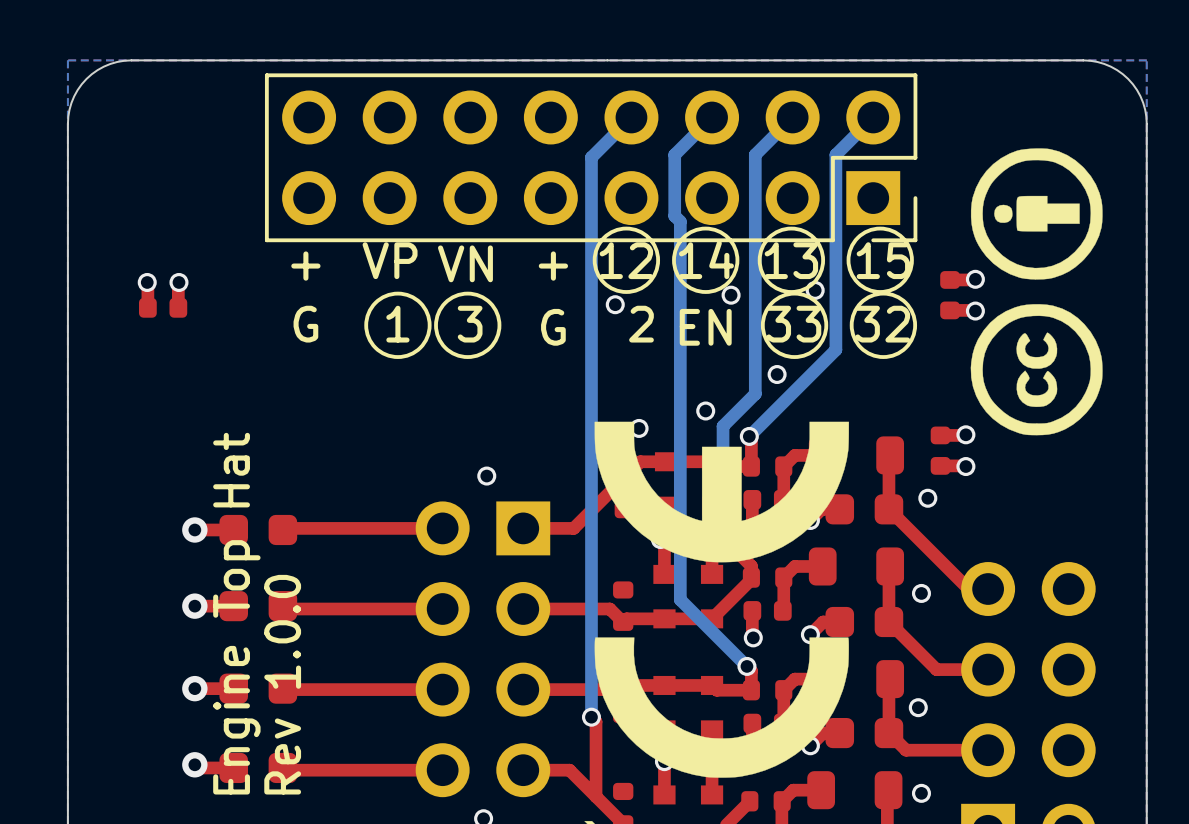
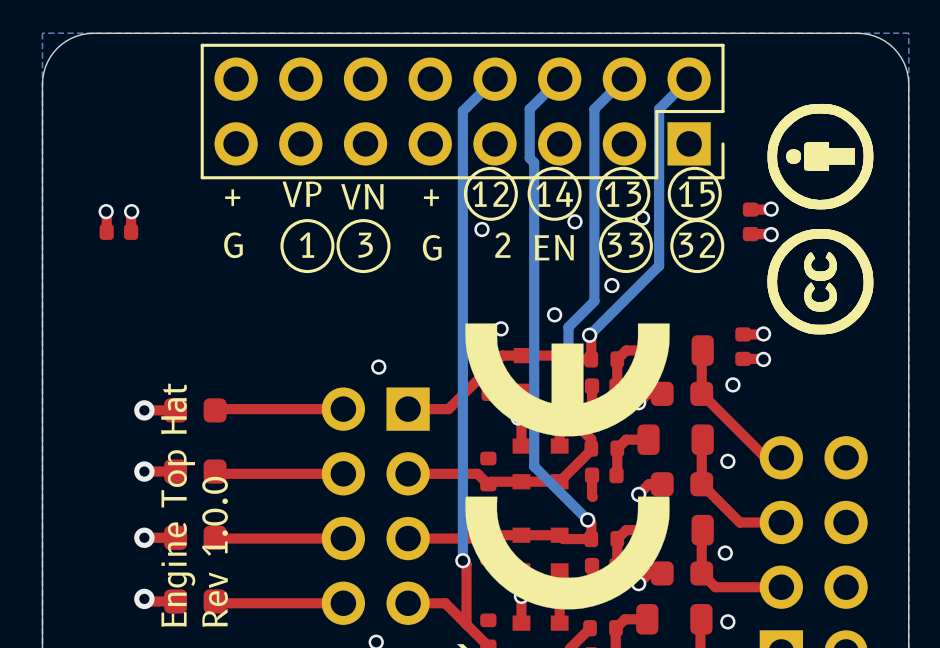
drawing: none -> [767, 103, 874, 335]
via: (753, 637) -> none

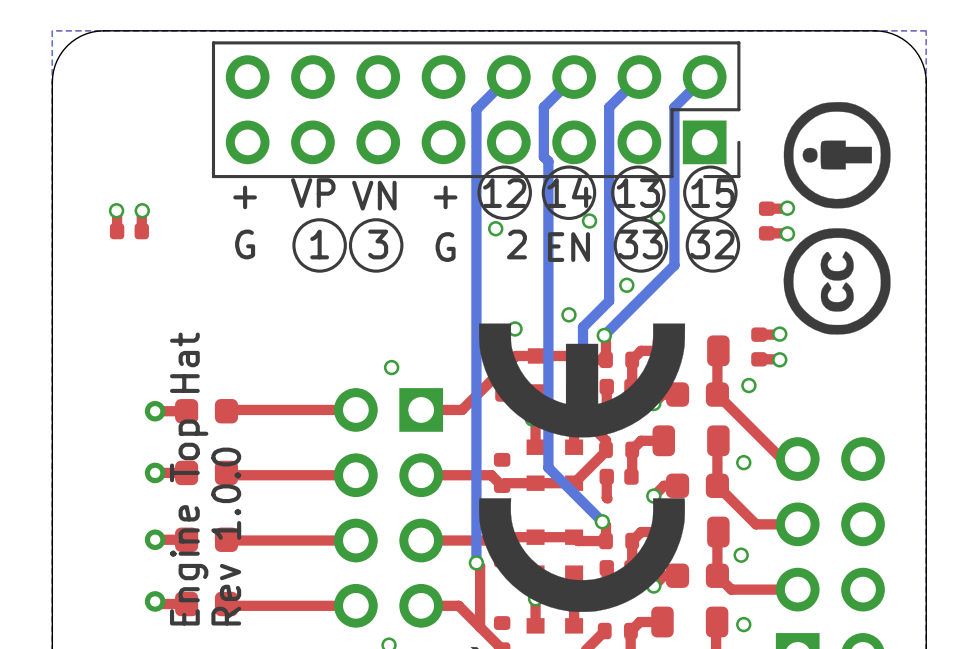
drawing: [767, 103, 874, 335] -> none

